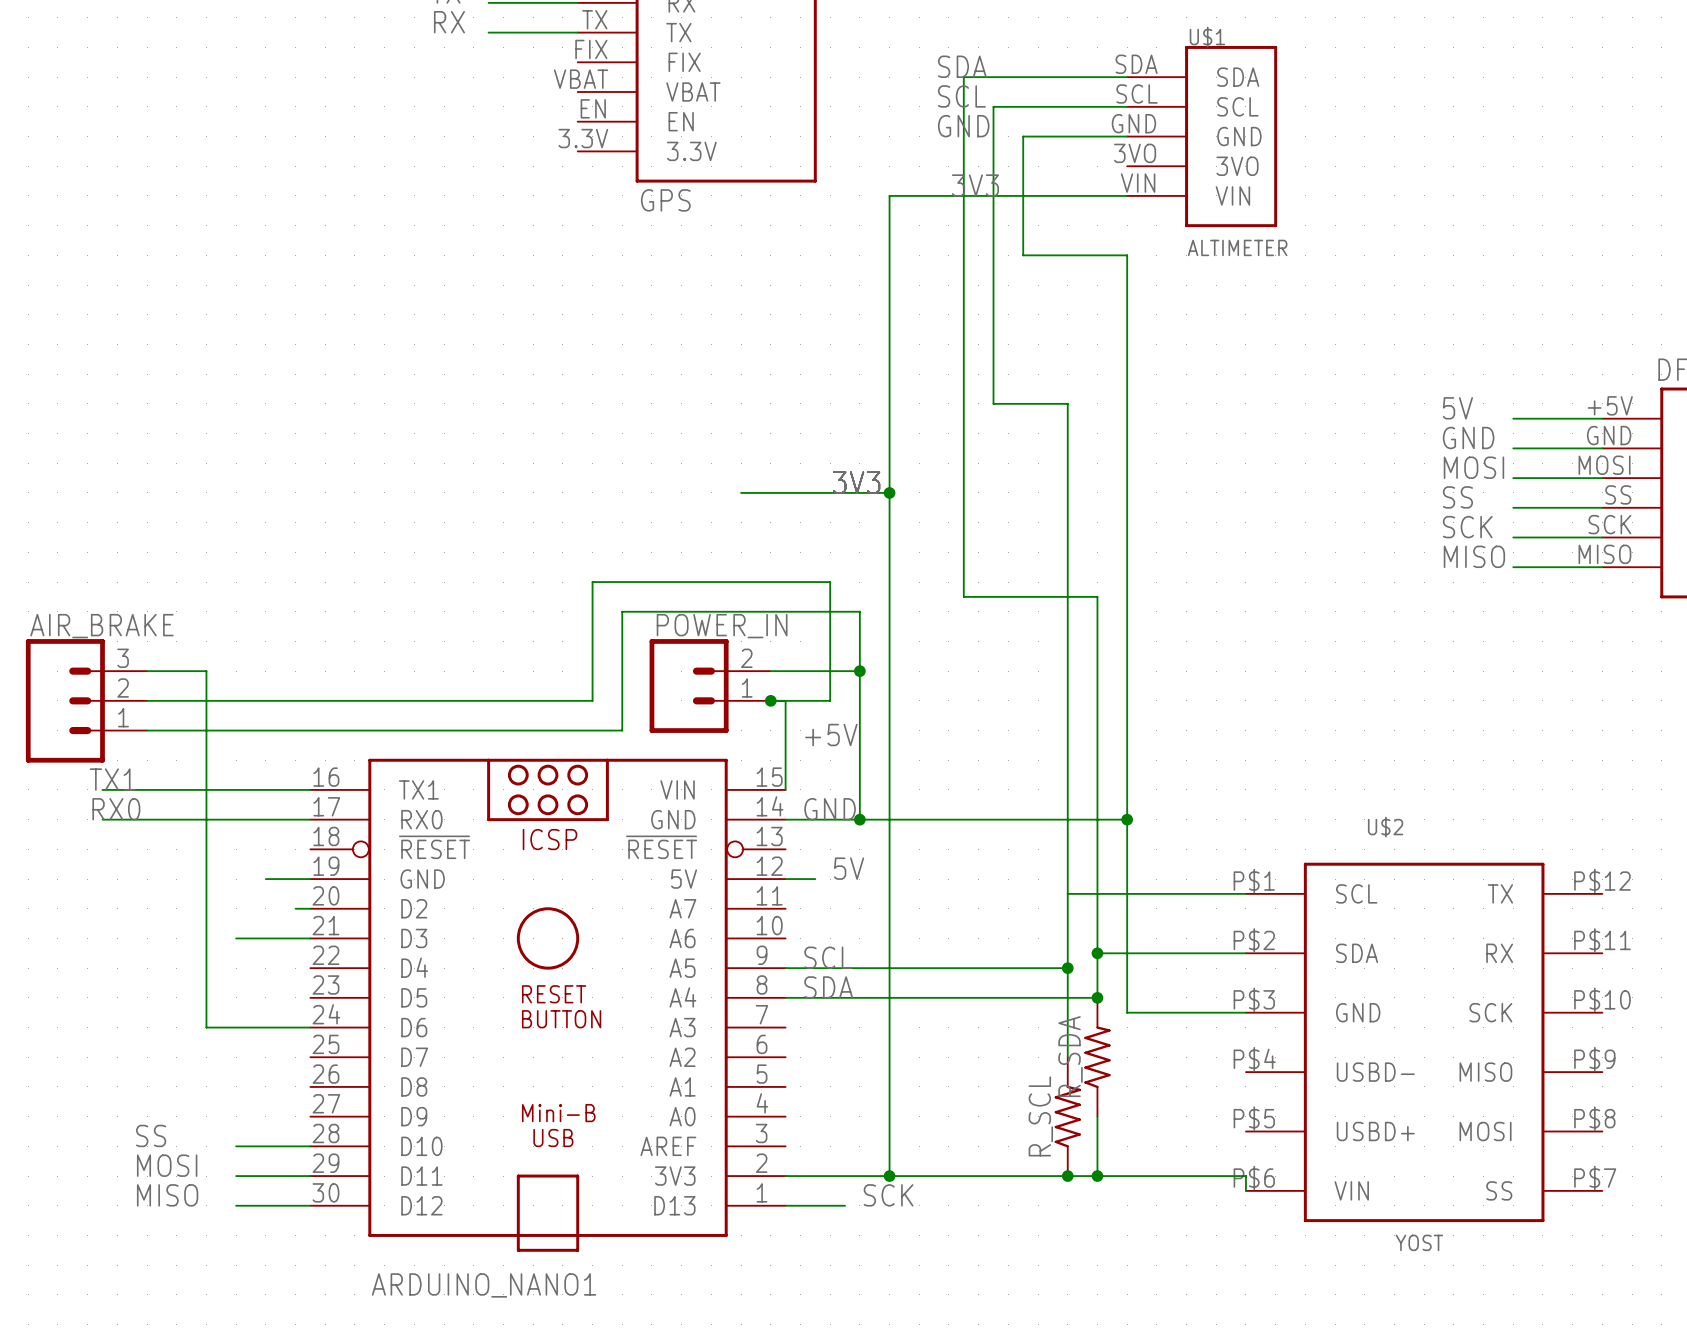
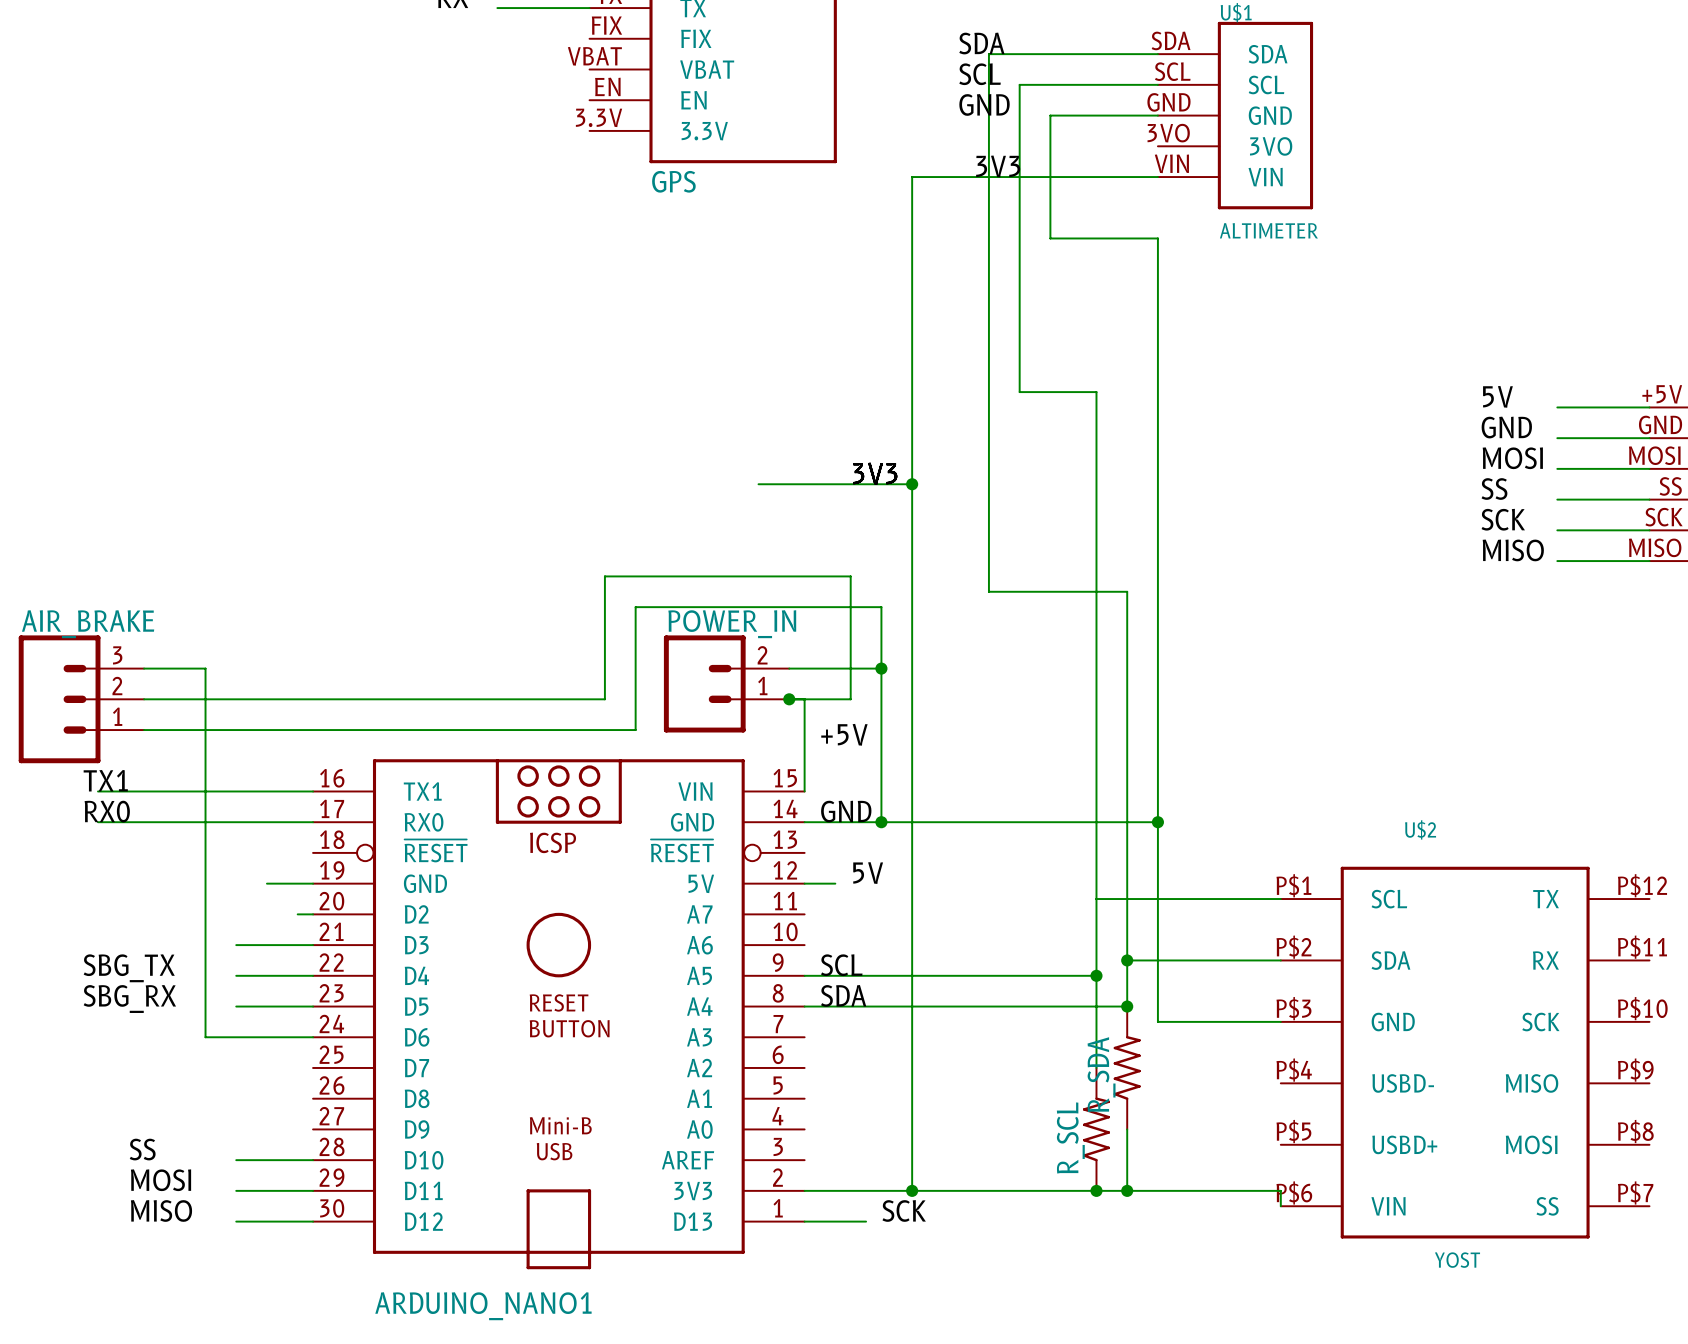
label: none -> SBG_TX (129, 968)
wire: none -> (236, 975) (313, 975)
label: none -> SBG_RX (129, 999)
wire: none -> (236, 1006) (313, 1006)

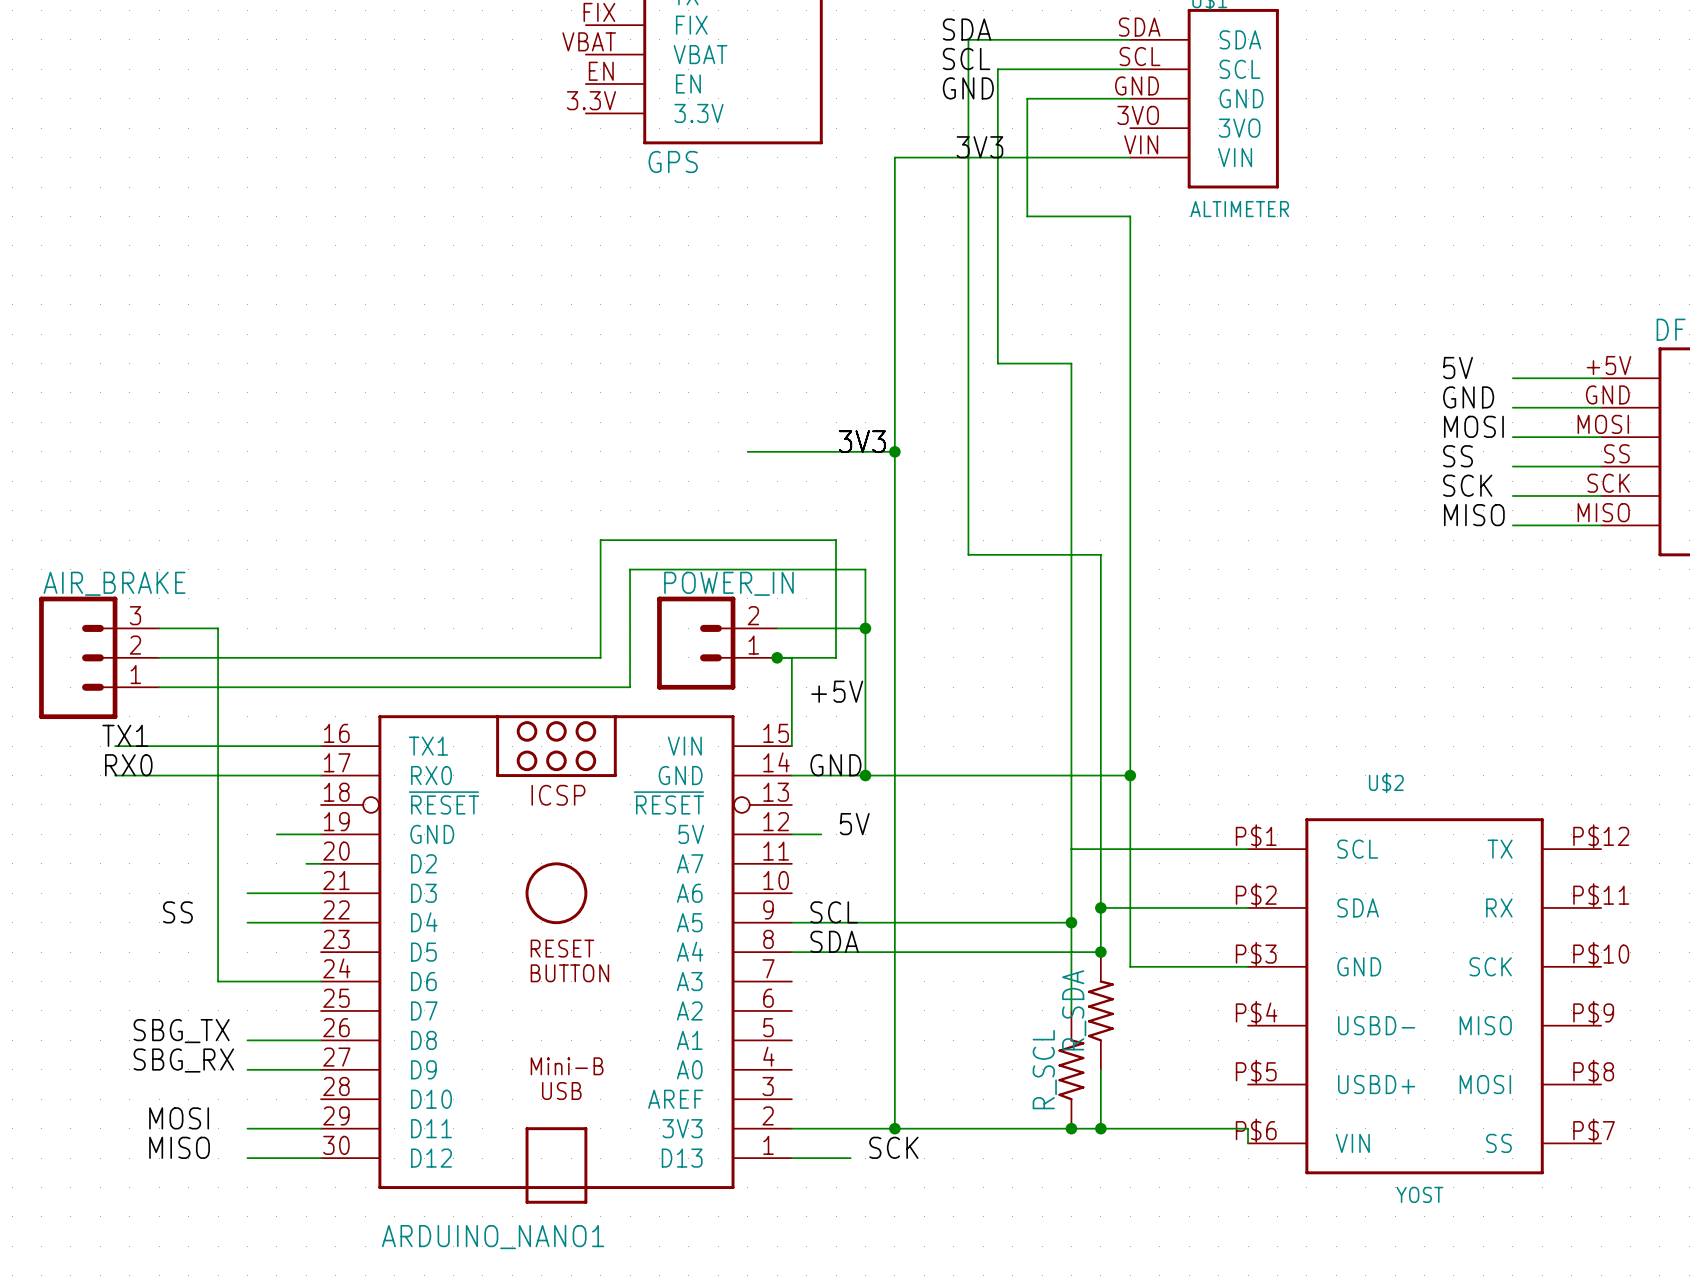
label position: SBG_TX (129, 968) -> SBG_TX (181, 1031)
label position: SBG_RX (129, 999) -> SBG_RX (183, 1060)
wire: (236, 1006) (313, 1006) -> (247, 1040) (321, 1040)
label position: SS (142, 1149) -> SS (177, 912)
wire: (236, 1160) (313, 1160) -> (247, 1069) (321, 1069)

